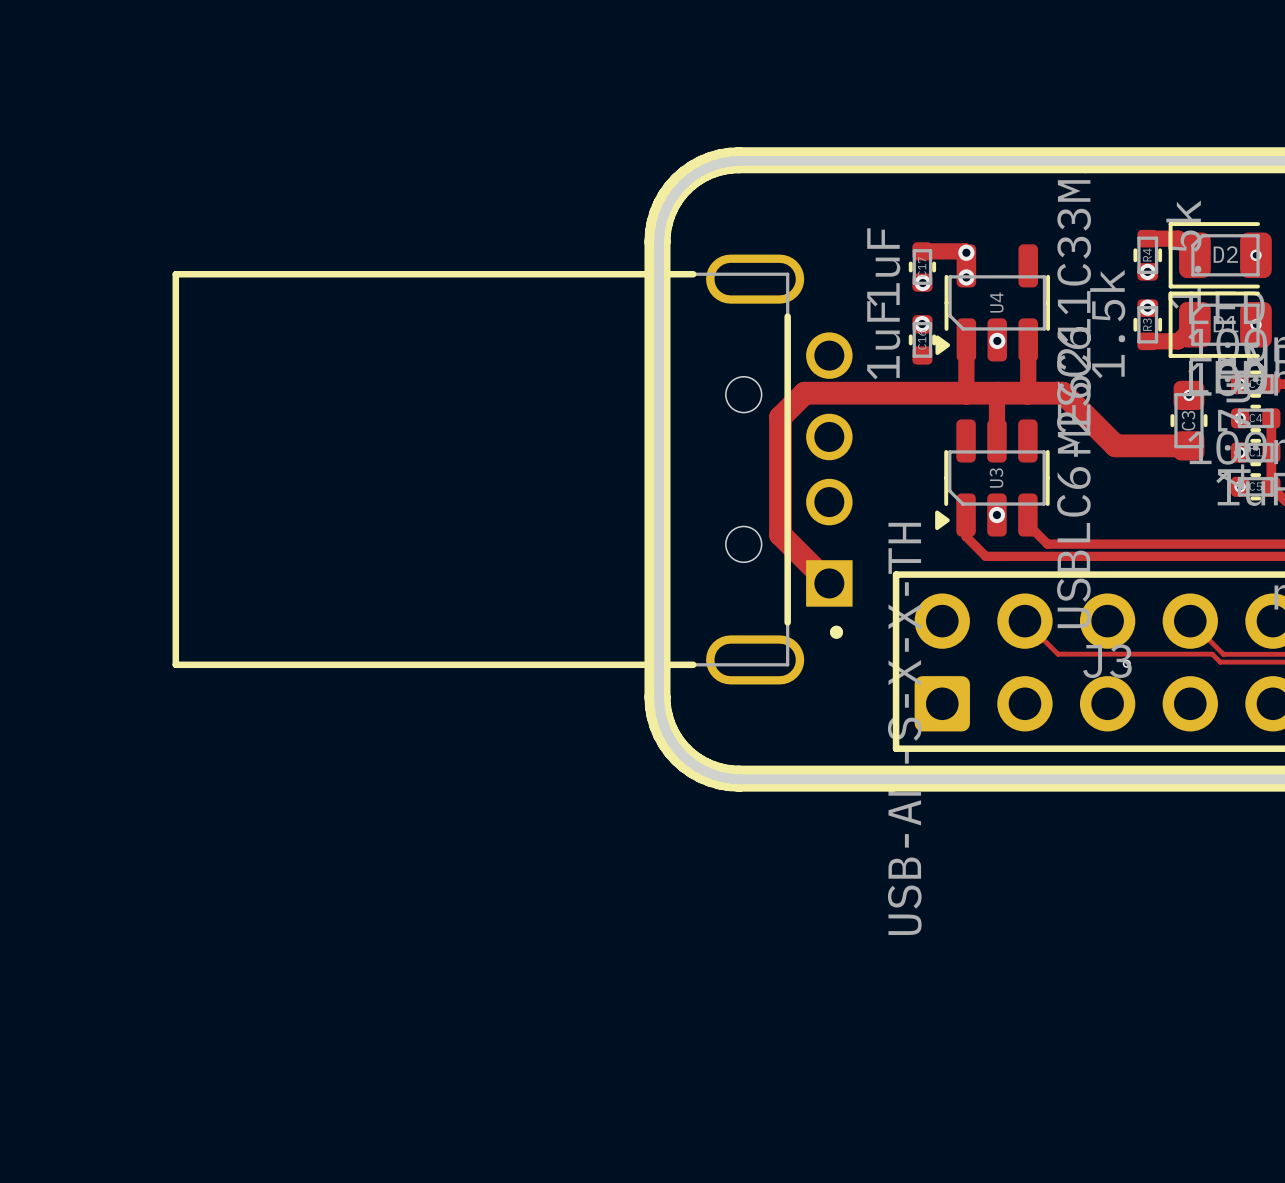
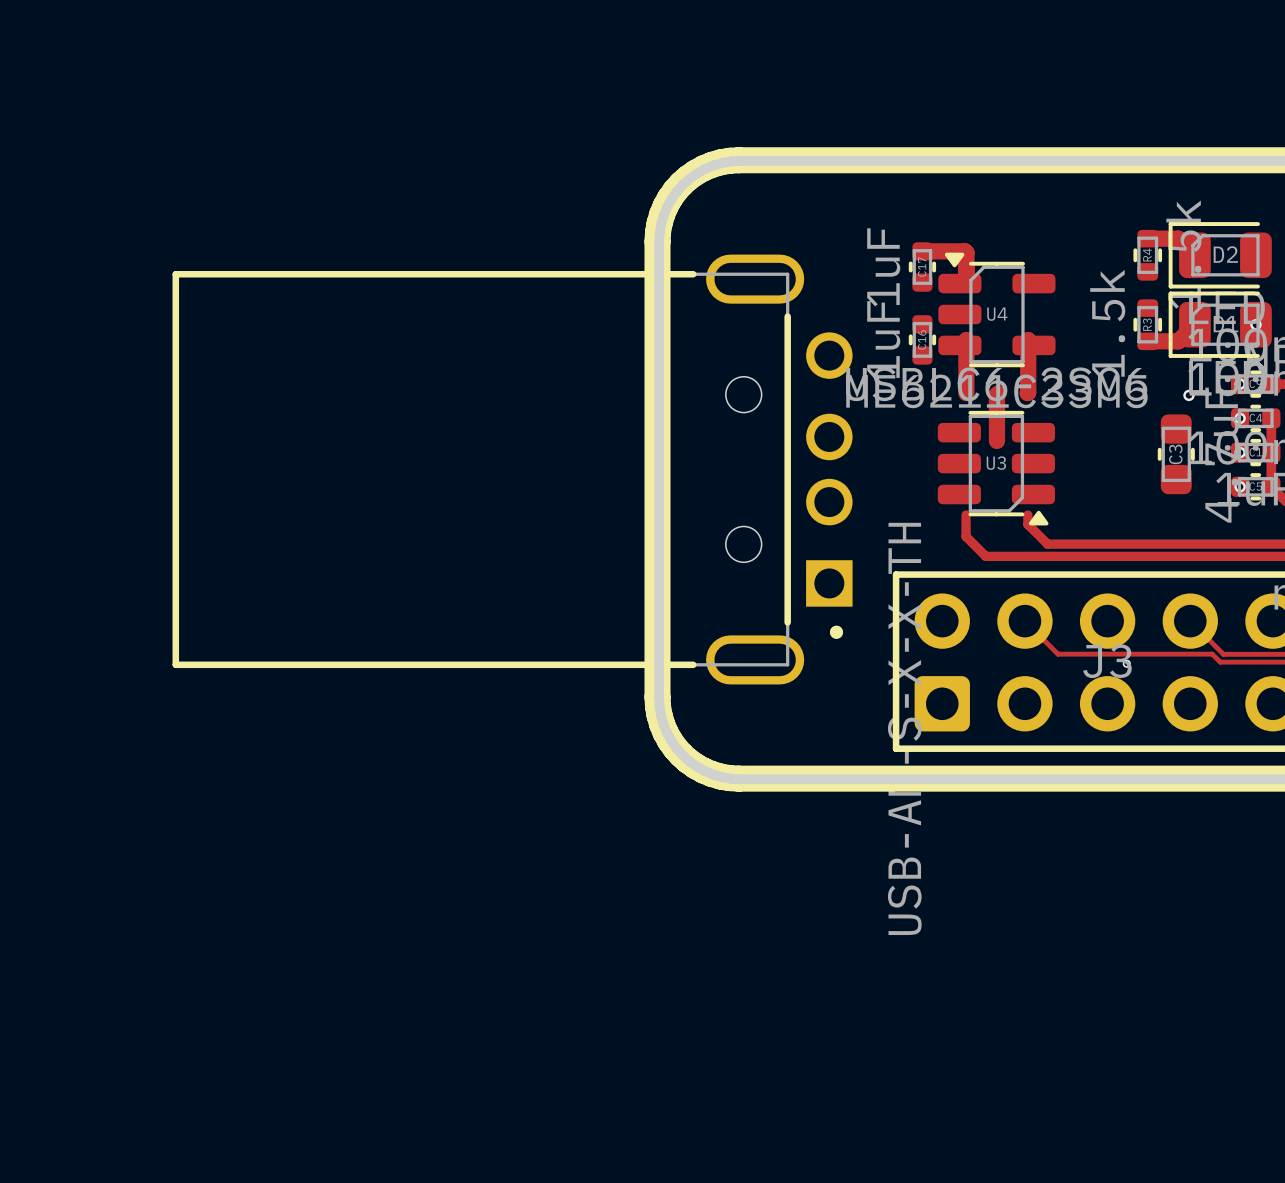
via: (966, 252) -> none
via: (1255, 255) -> none
via: (1147, 271) -> none
via: (966, 277) -> none
via: (922, 283) -> none
U4 rotation: 0° (992, 302) -> 90° clockwise (996, 309)
via: (1147, 307) -> none
via: (922, 324) -> none
via: (997, 340) -> none
C3 position: (1188, 420) -> (1176, 454)
track: (1188, 445) (1115, 445) (1062, 393) (804, 393) (780, 417) (780, 534) (829, 583) -> none
U3 rotation: 0° (992, 477) -> 90° counterclockwise (996, 468)
via: (996, 515) -> none

